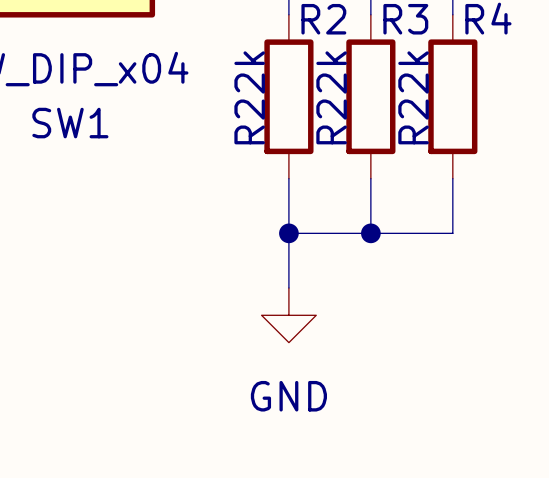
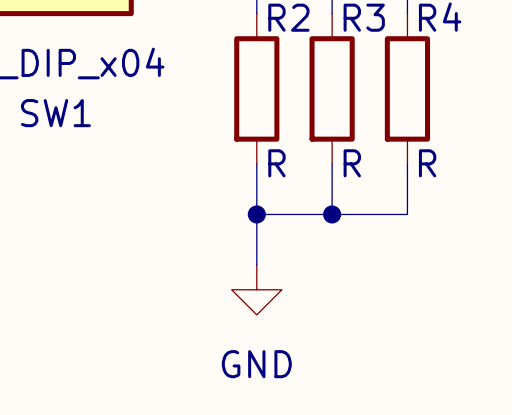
R2 value: R22k (249, 97) -> R (276, 163)
R3 value: R22k (331, 97) -> R (352, 163)
R4 value: R22k (413, 97) -> R (427, 163)

